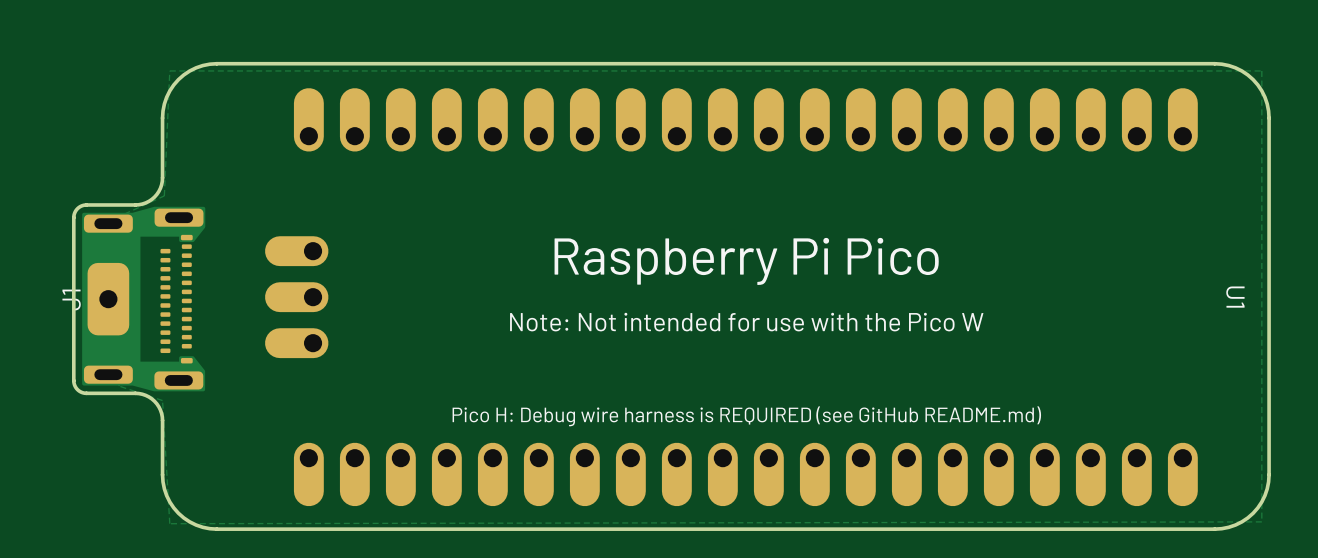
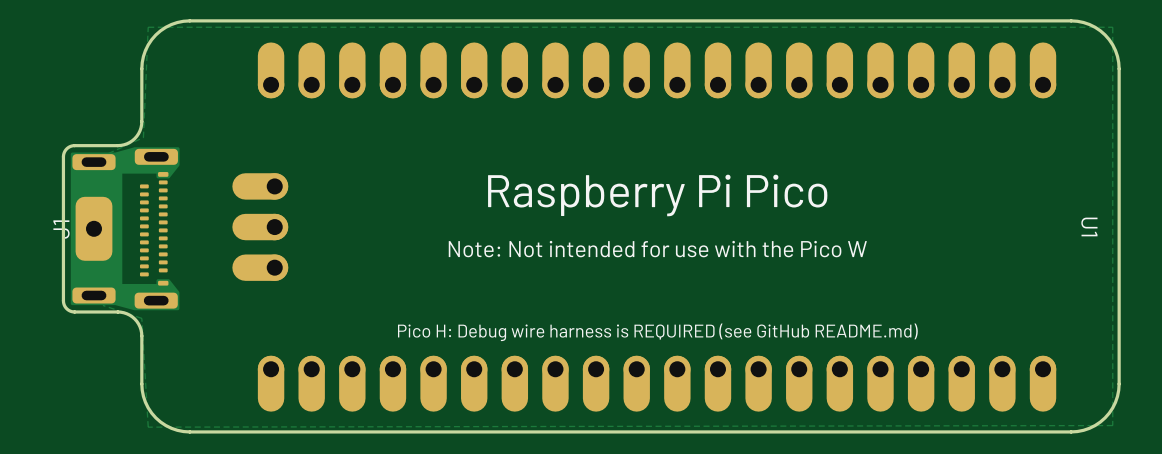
U1 footprint: [265, 88, 1198, 507] -> [232, 42, 1057, 412]

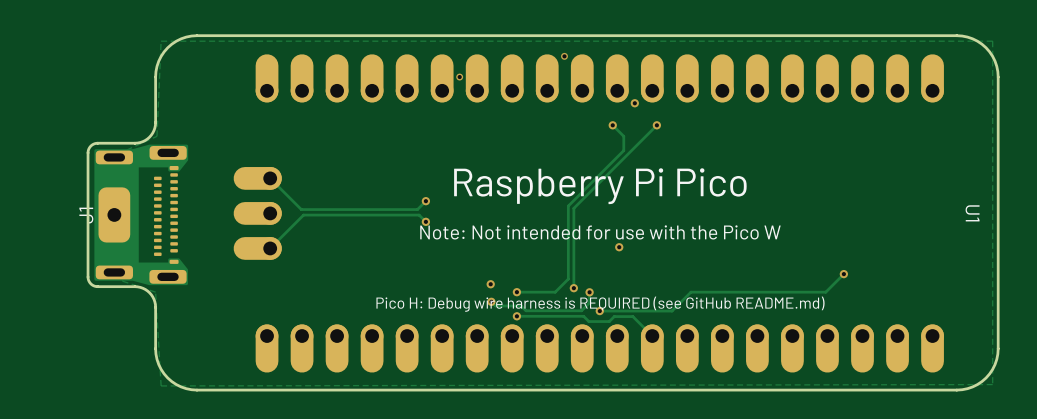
via: none -> (564, 56)
via: none -> (459, 77)
via: none -> (634, 103)
track: none -> (612, 125) (623, 136) (623, 150) (568, 206) (568, 279) (555, 292) (516, 292)
via: none -> (612, 125)
track: none -> (656, 125) (573, 208) (573, 288)
via: none -> (656, 125)
track: none -> (270, 178) (301, 209) (417, 209) (425, 201)
via: none -> (425, 201)
track: none -> (425, 221) (419, 215) (303, 215) (270, 248)
via: none -> (425, 221)
via: none -> (619, 247)
track: none -> (843, 274) (825, 292) (690, 292) (672, 311) (599, 311)
via: none -> (843, 274)
via: none -> (490, 284)
via: none -> (573, 288)
via: none -> (516, 292)
track: none -> (589, 292) (589, 302) (581, 310) (526, 310) (521, 305) (495, 305) (491, 301)
via: none -> (589, 292)
via: none -> (491, 301)
via: none -> (599, 311)
track: none -> (516, 313) (516, 316) (583, 316) (588, 321) (609, 321) (614, 316) (632, 316) (652, 336)
via: none -> (516, 316)

